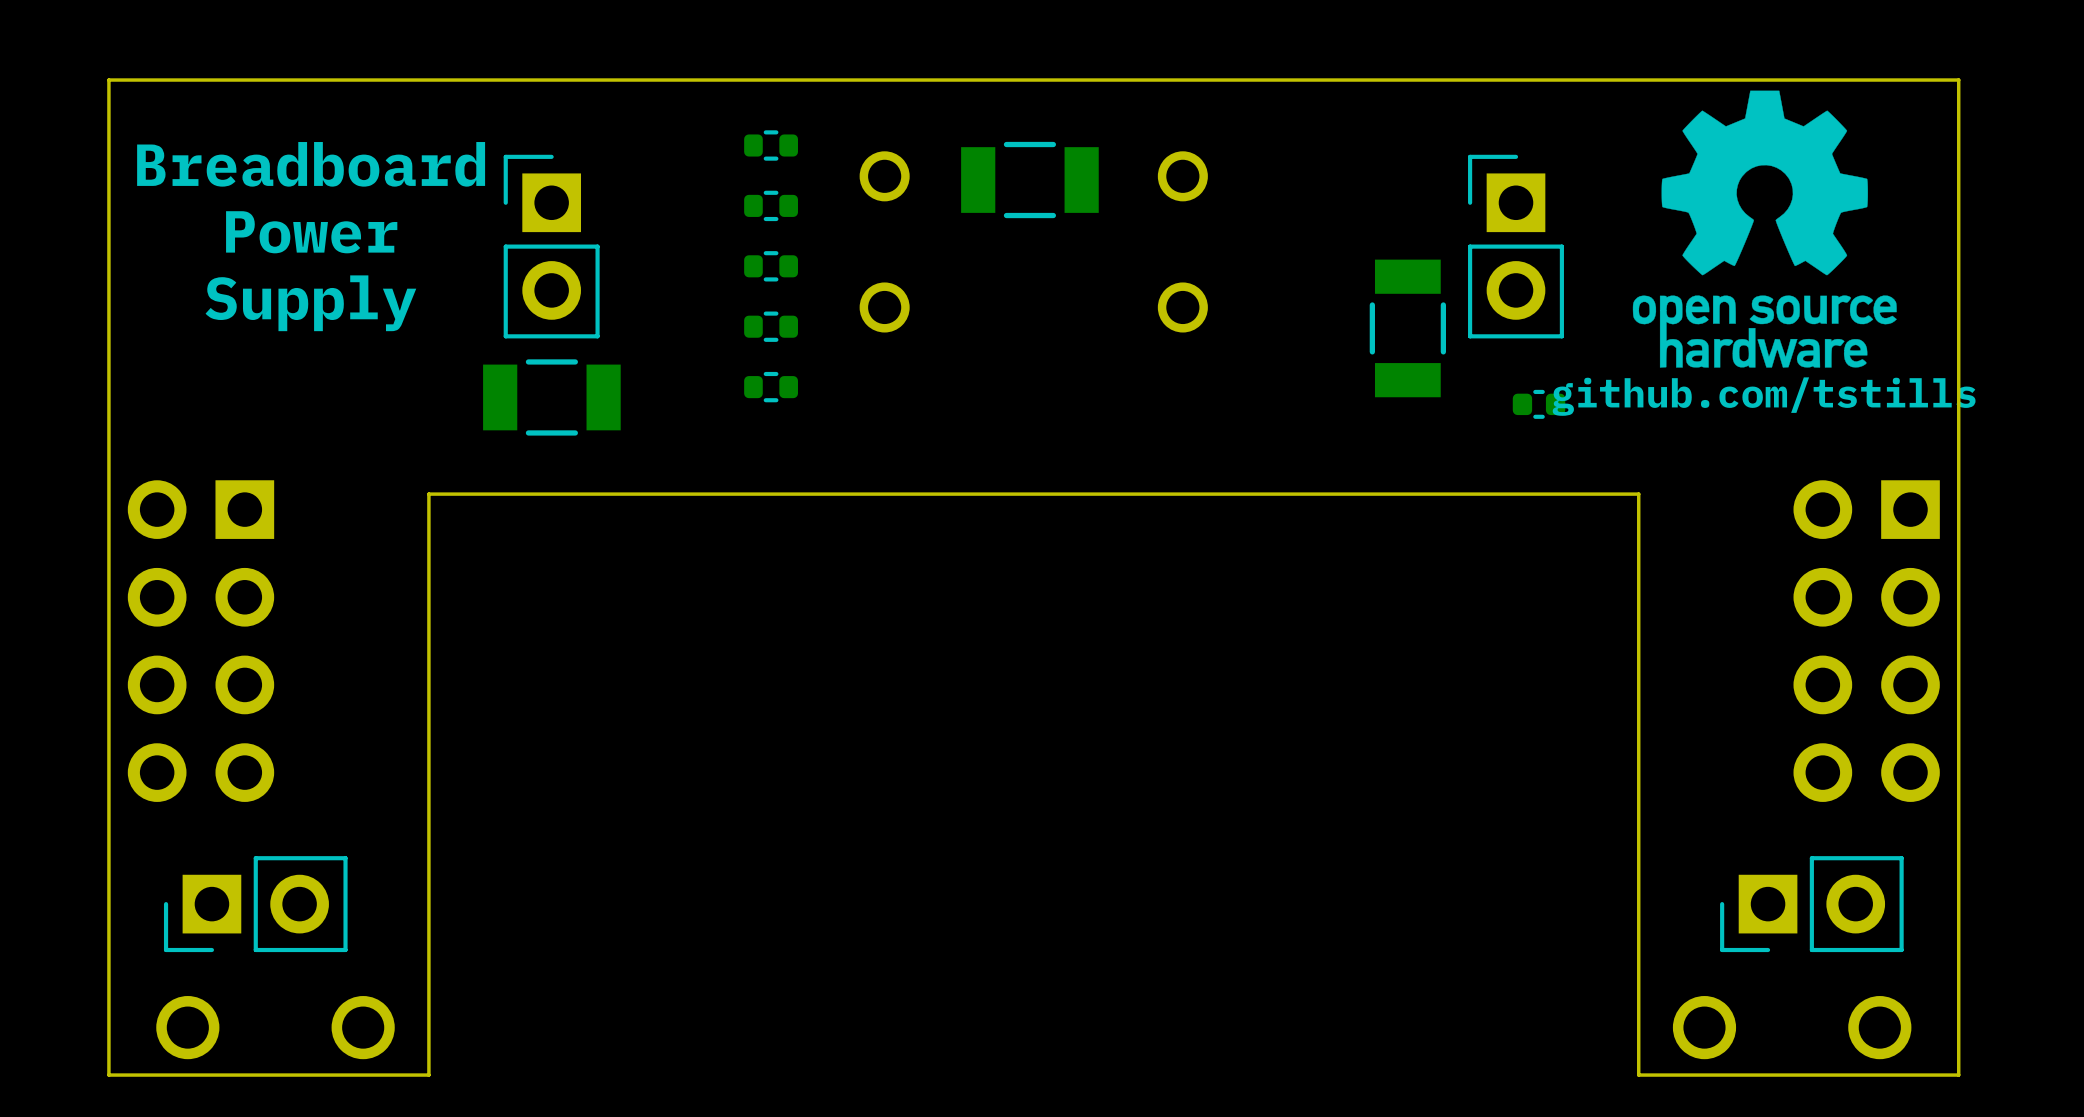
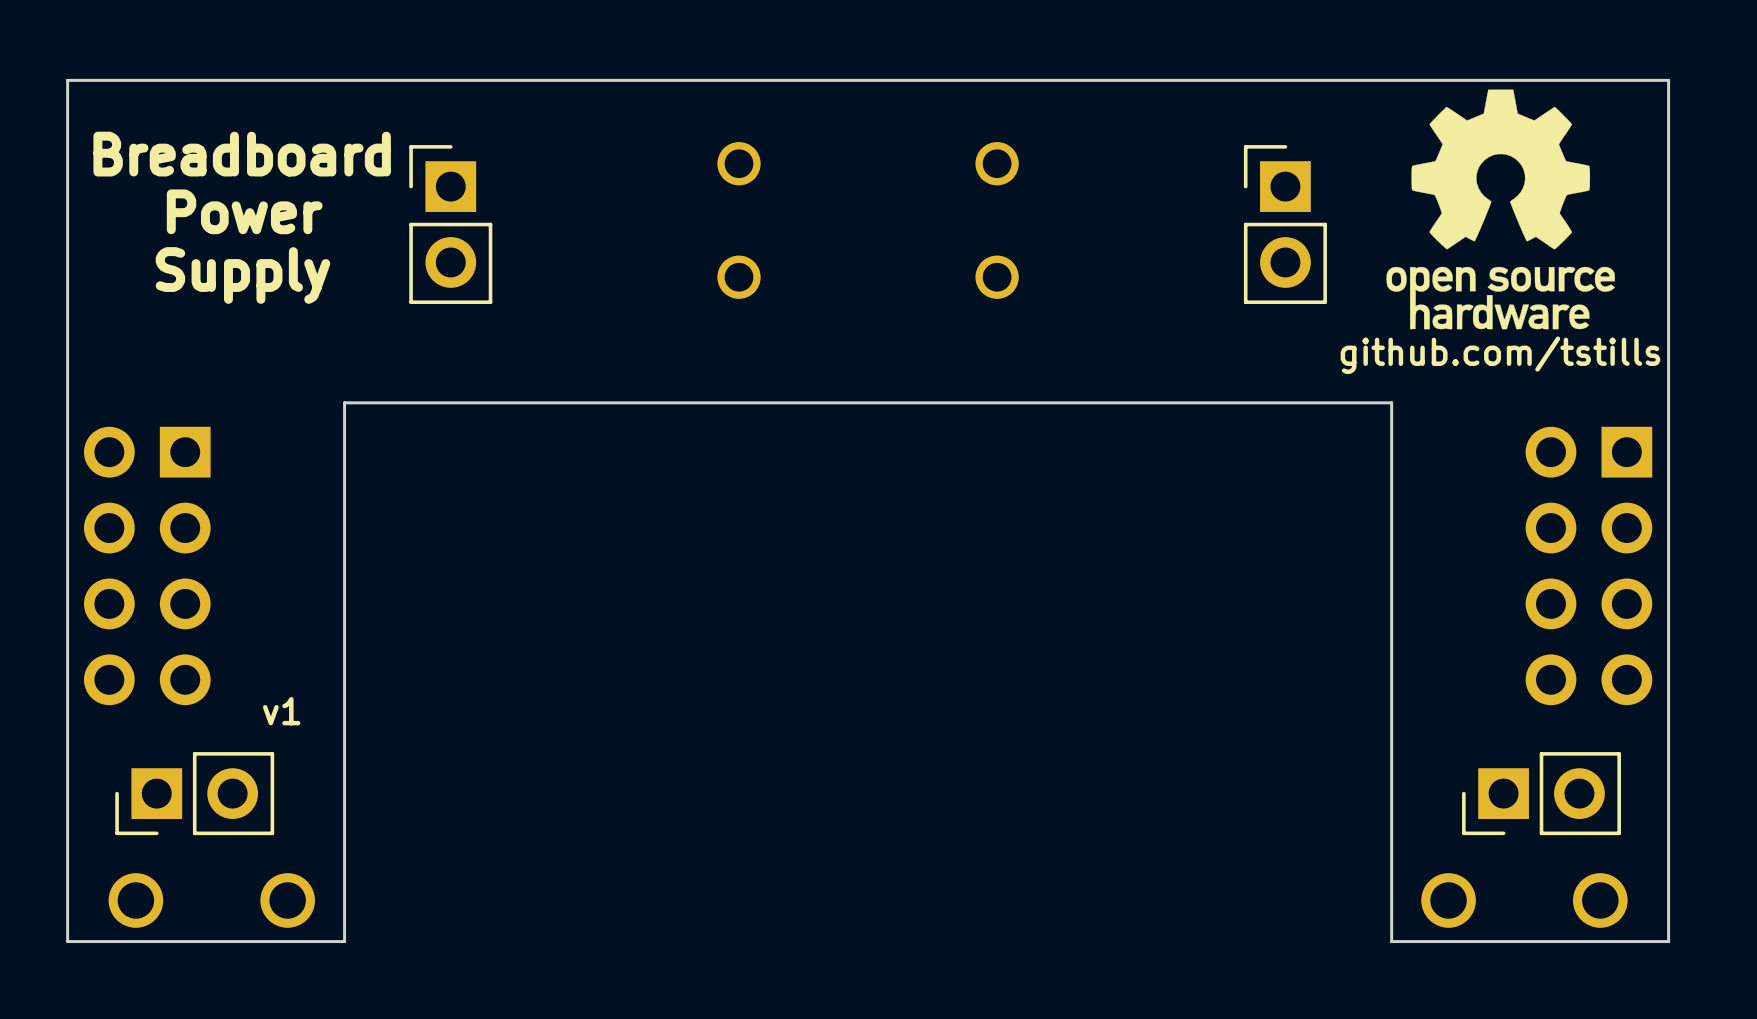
part: (771, 145) -> none
part: (1029, 180) -> none
part: (771, 205) -> none
part: (771, 266) -> none
part: (771, 326) -> none
part: (1407, 328) -> none
part: (771, 387) -> none
part: (551, 397) -> none
part: (1539, 404) -> none
board edge: (1638, 494) (428, 494) -> (1391, 438) (1391, 402) (344, 402) (344, 438)
text: none -> v1 (281, 711)

